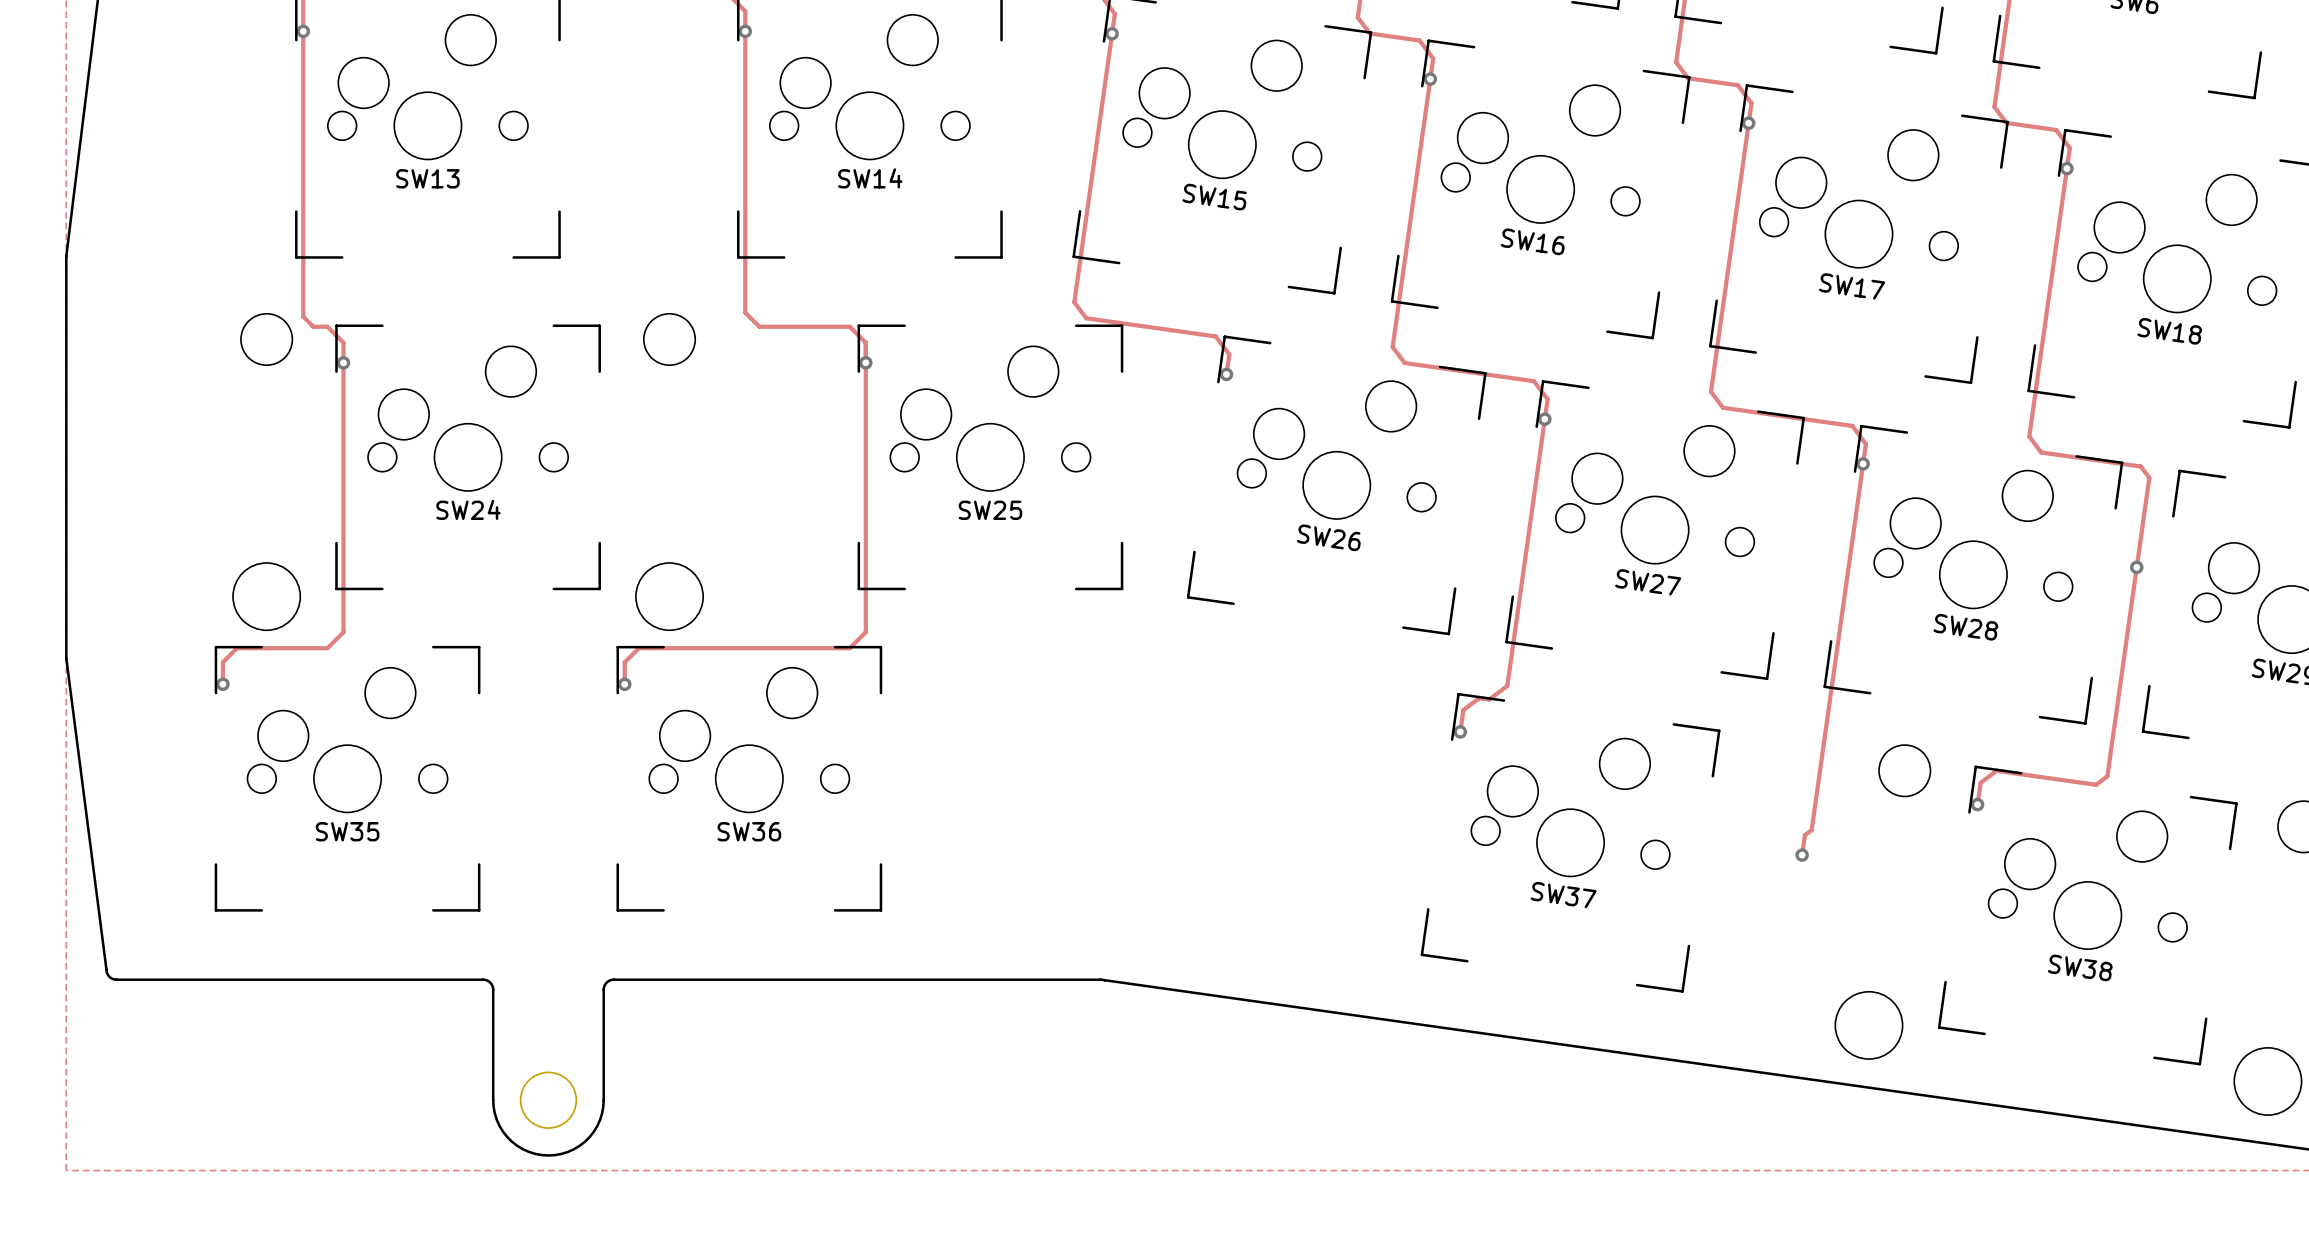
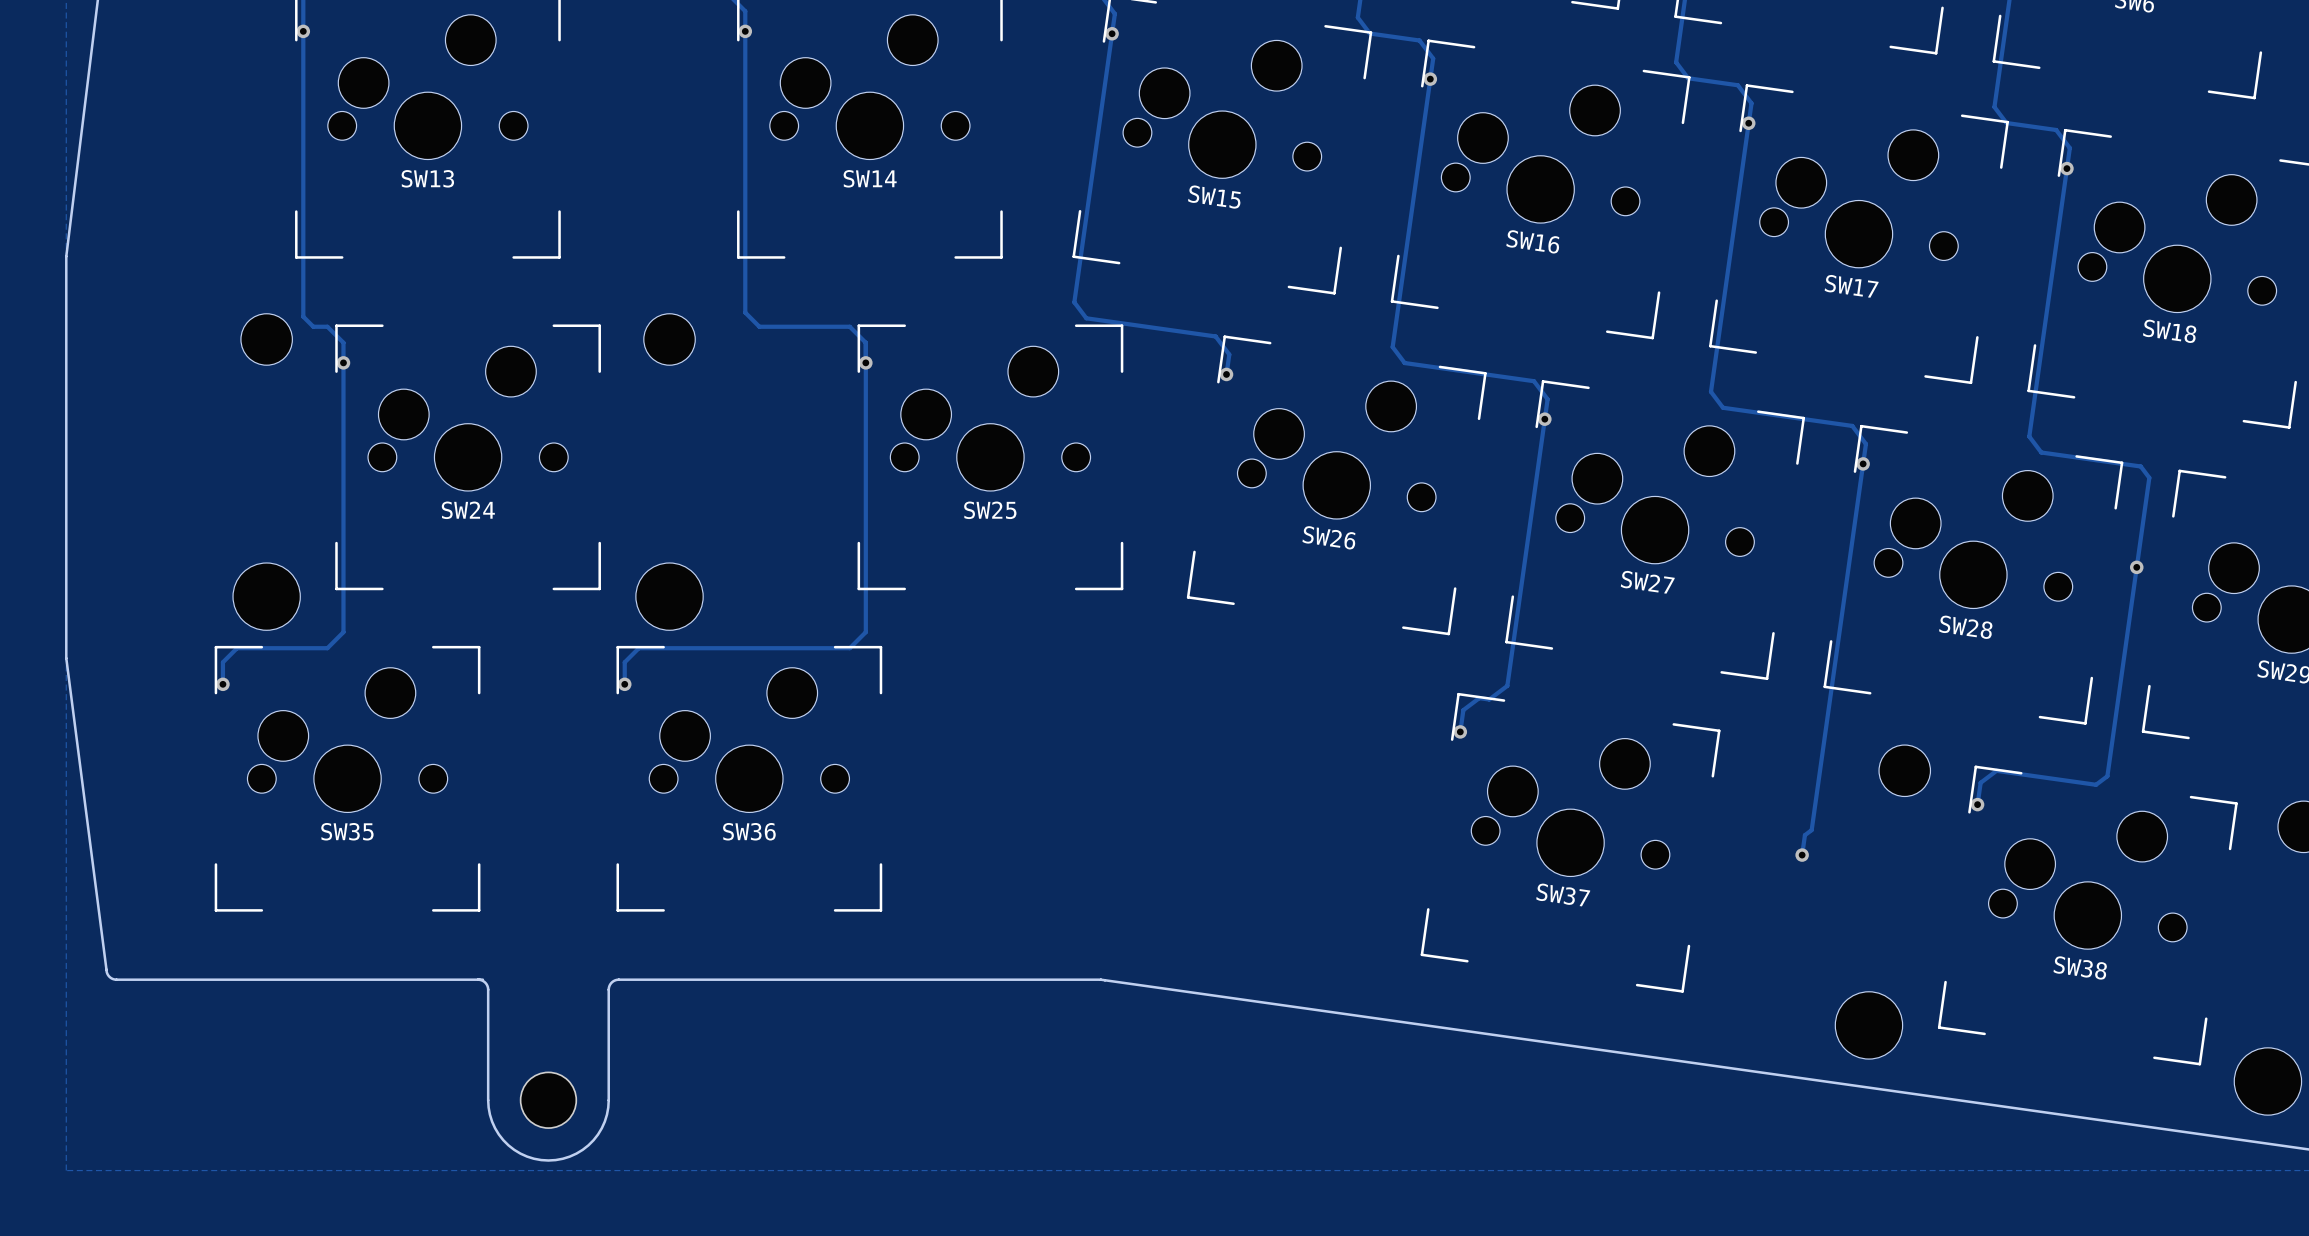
board edge: (483, 979) (489, 981) (493, 988) (493, 1100) (496, 1119) (507, 1136) (517, 1145) (535, 1153) (548, 1155) (561, 1153) (579, 1145) (589, 1136) (600, 1119) (603, 1100) (603, 988) (606, 982) (613, 979) -> none
board edge: (614, 979) (618, 979) -> (478, 979) (485, 982) (488, 988) (488, 1100) (492, 1121) (498, 1134) (514, 1149) (527, 1156) (548, 1160) (562, 1158) (582, 1149) (593, 1140) (604, 1121) (608, 1100) (608, 988) (612, 981) (618, 979)

